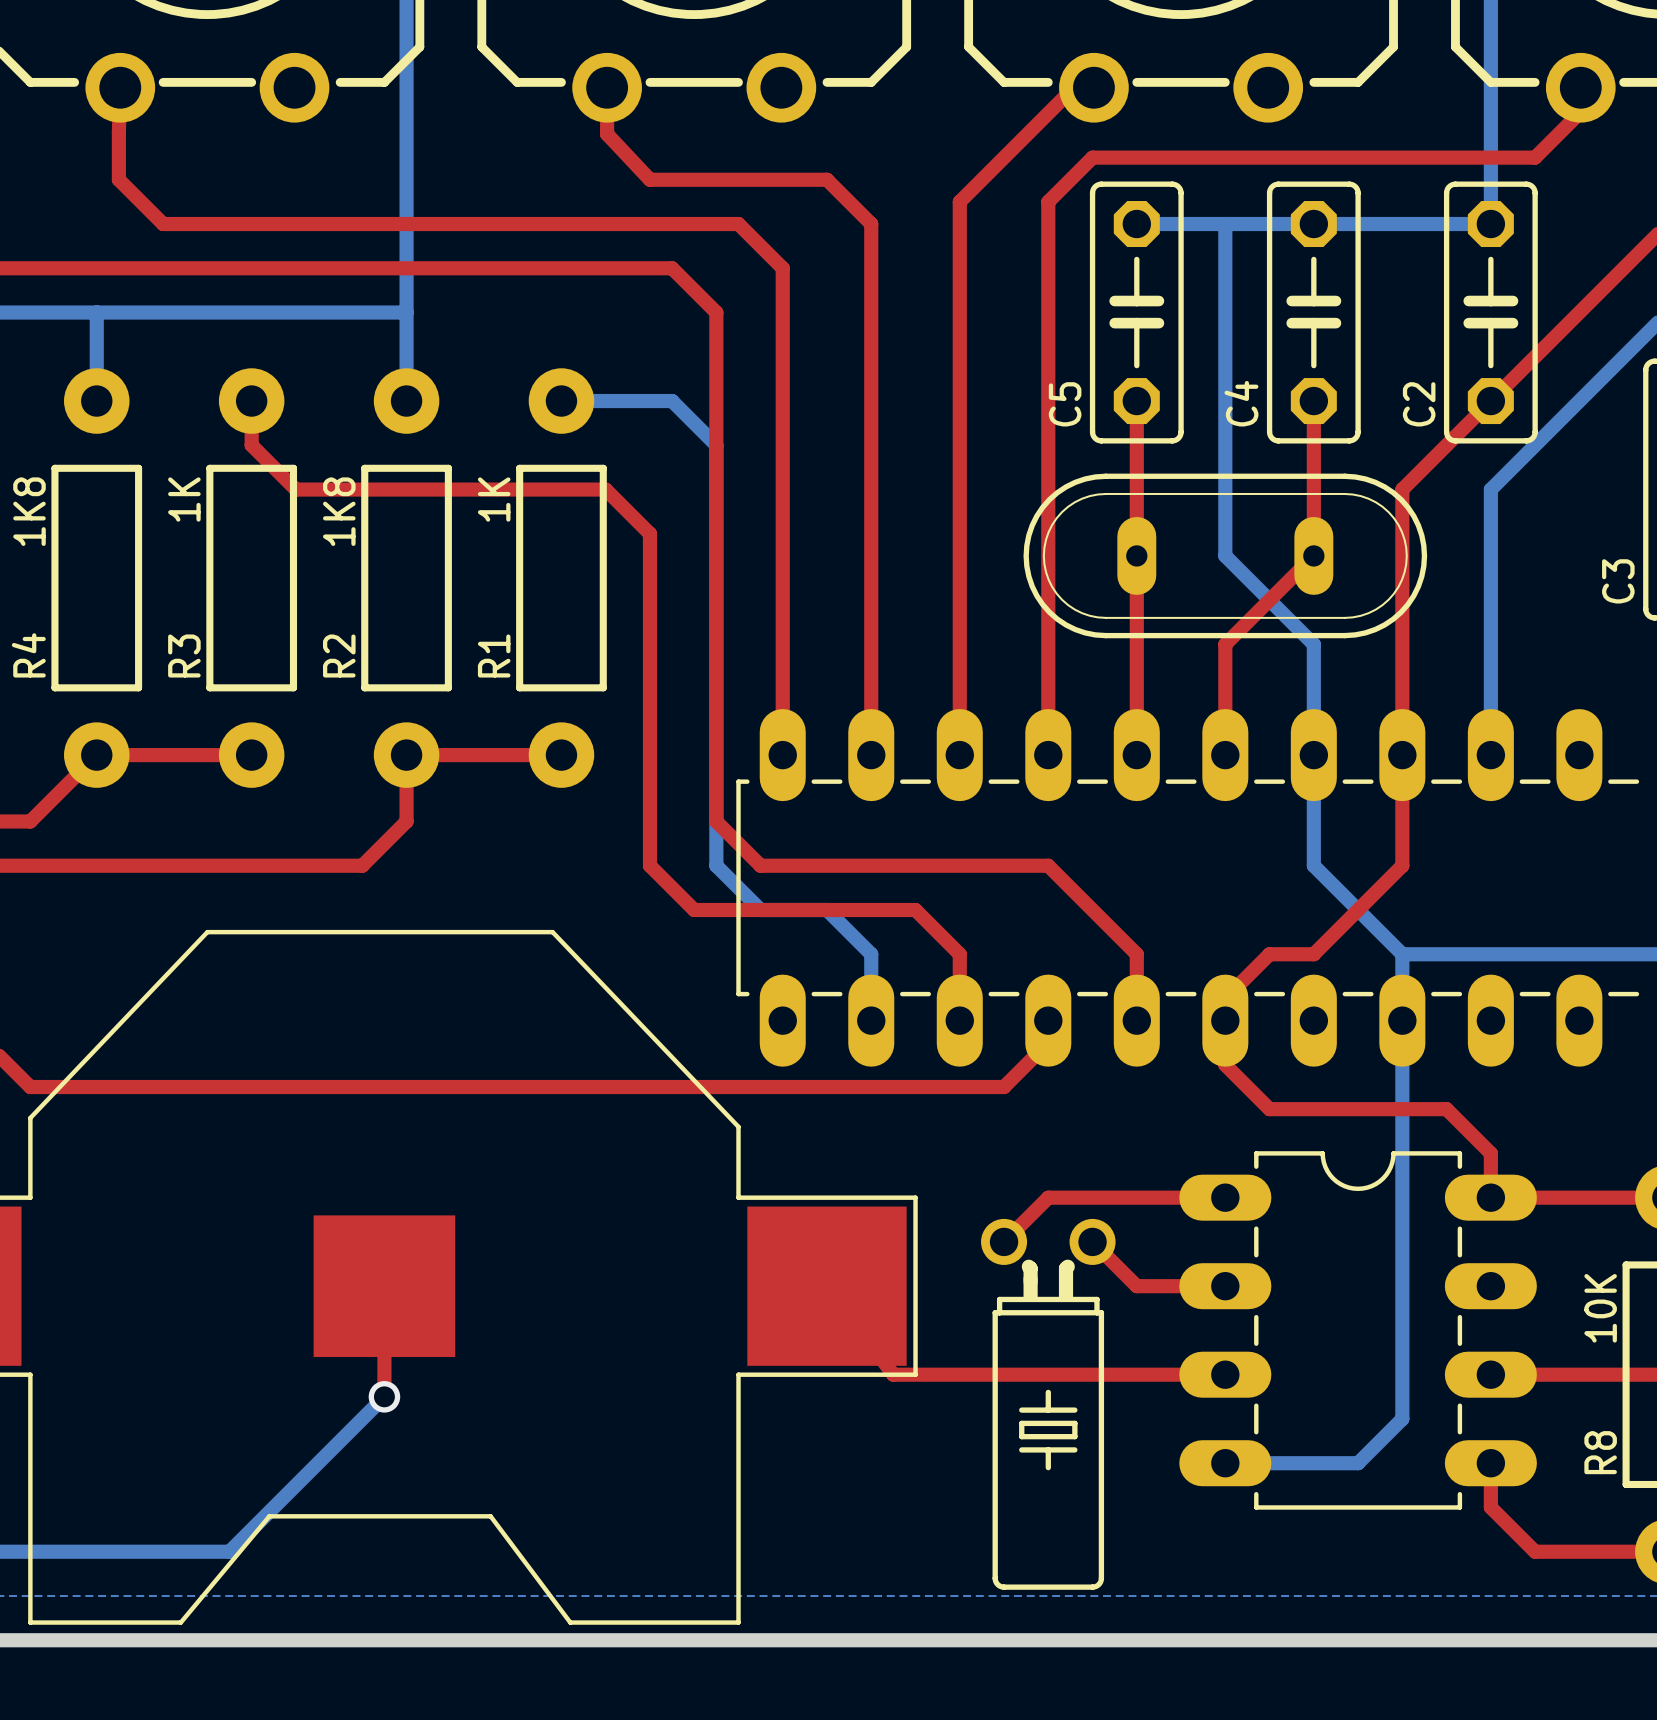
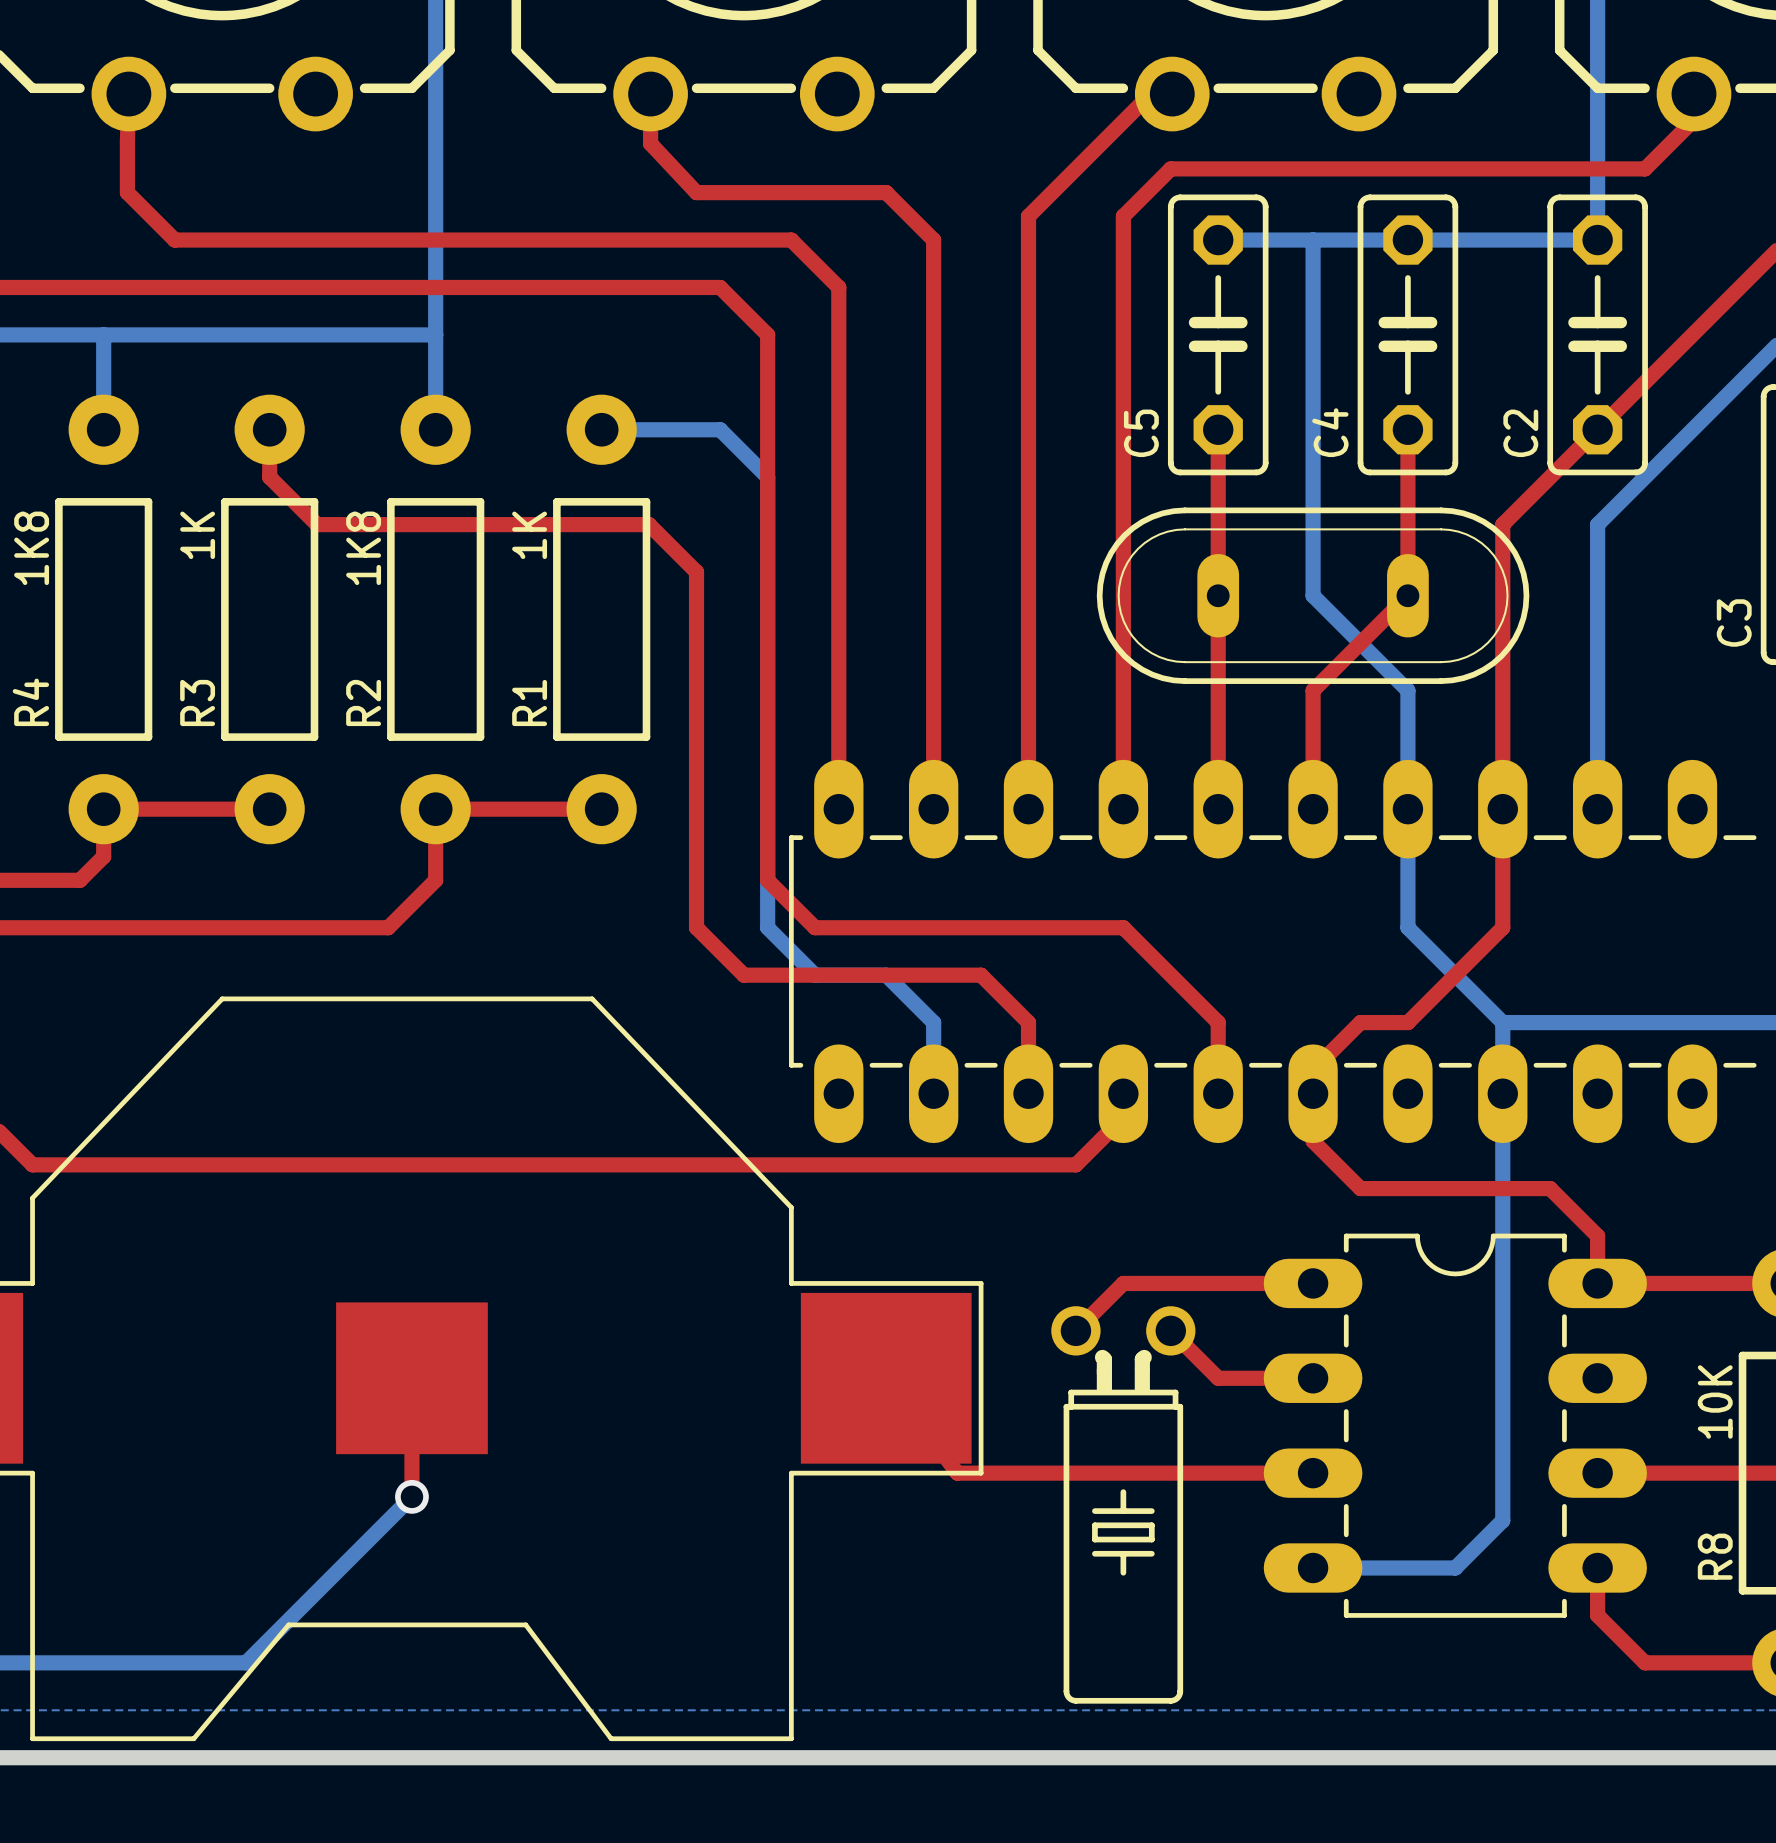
top track: (96, 755) (30, 821) -> (103, 809) (103, 856) (79, 880) (32, 880)

